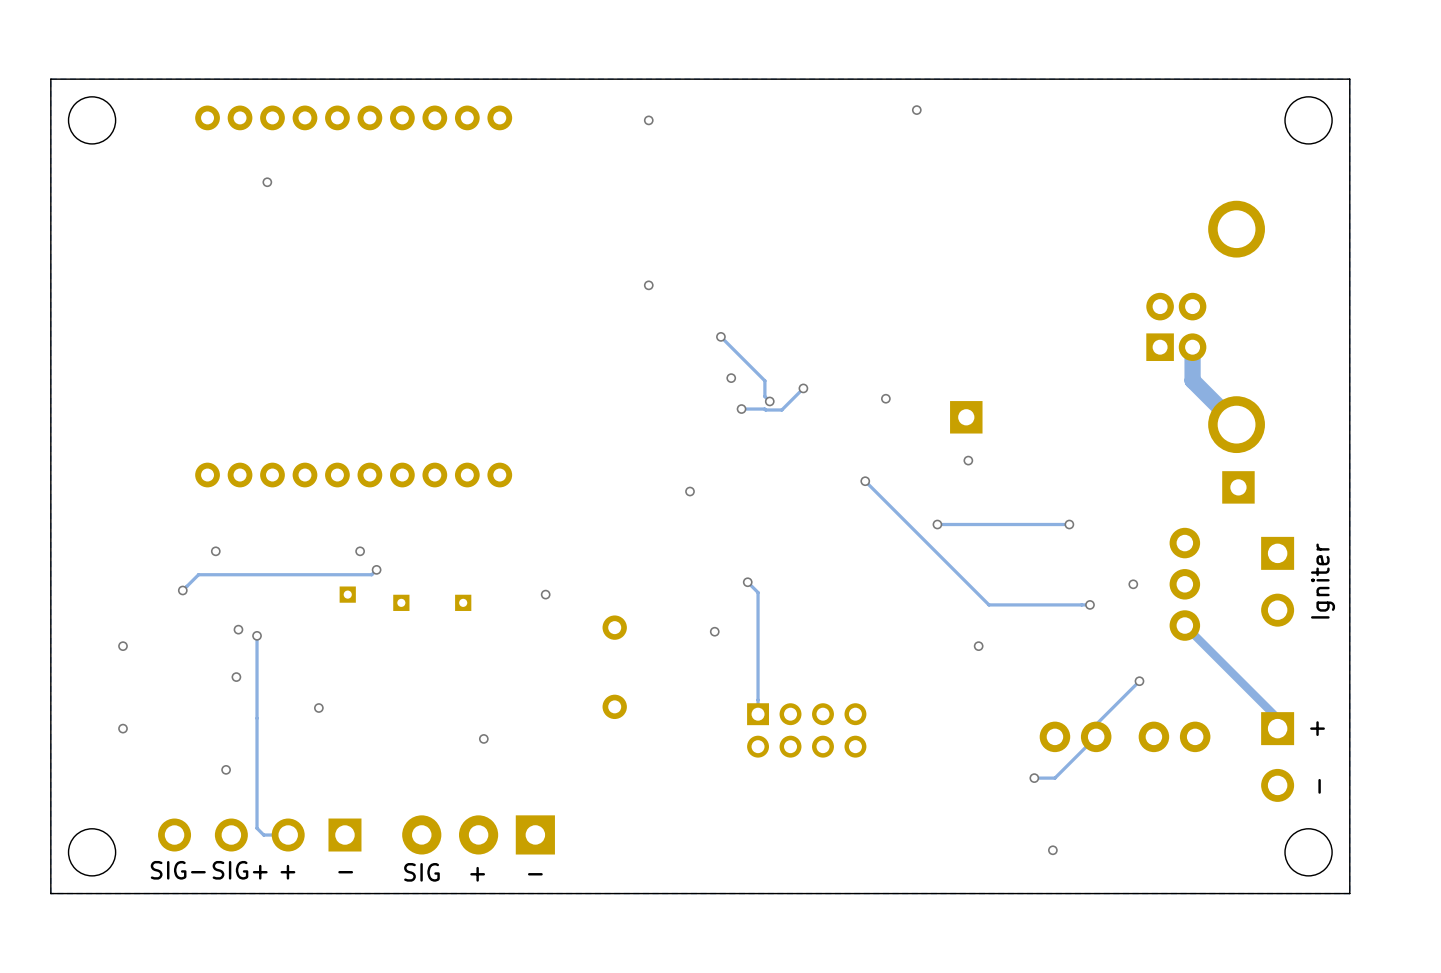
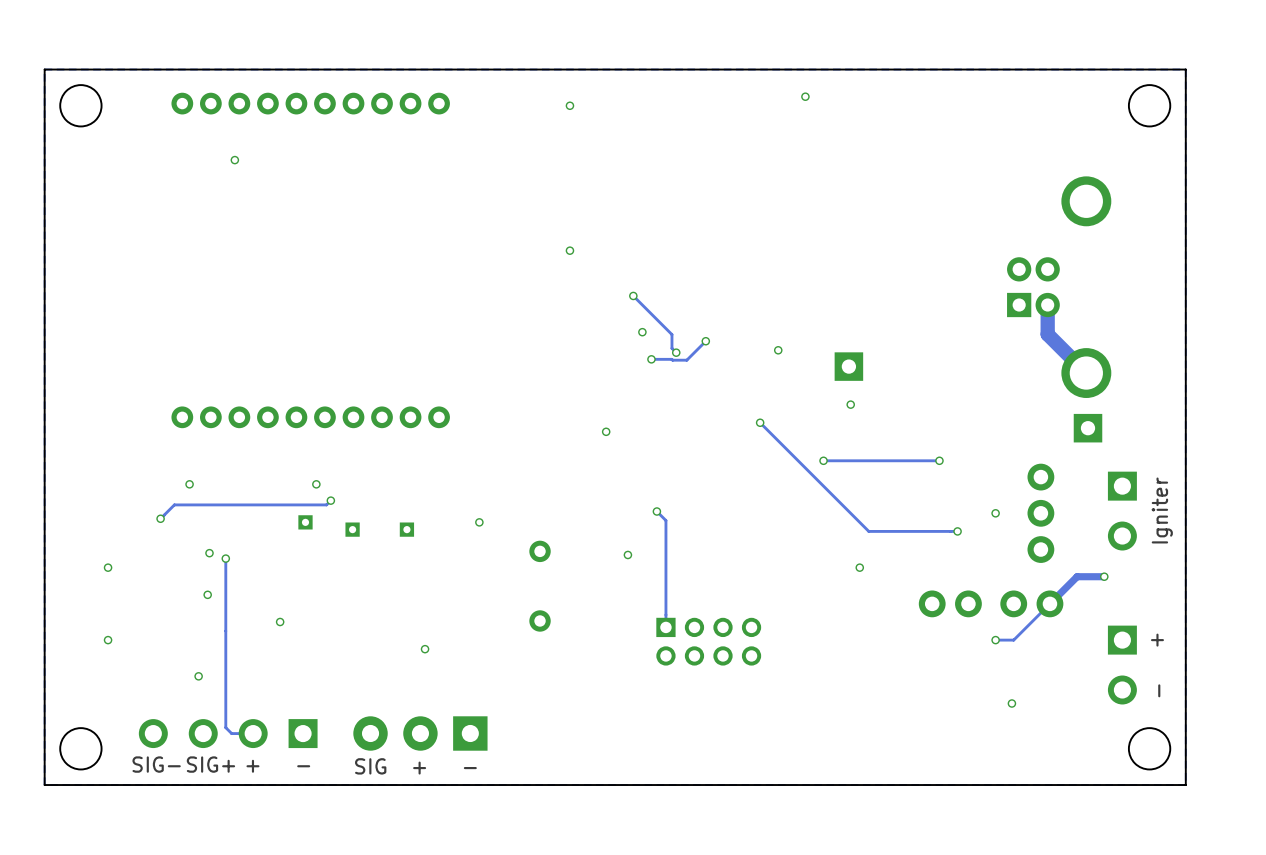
track: (1184, 625) (1277, 718) (1277, 728) -> none
track: none -> (1104, 576) (1077, 576) (1013, 640) (995, 640)
via: none -> (1104, 576)
track: (1139, 681) (1096, 724) (1096, 736) (1054, 778) (1034, 778) -> none
via position: (1139, 681) -> (995, 640)
part position: (1075, 736) -> (950, 603)
part position: (1174, 736) -> (1031, 603)
via: (1034, 778) -> none
via: none -> (1011, 703)
via: (1052, 850) -> none

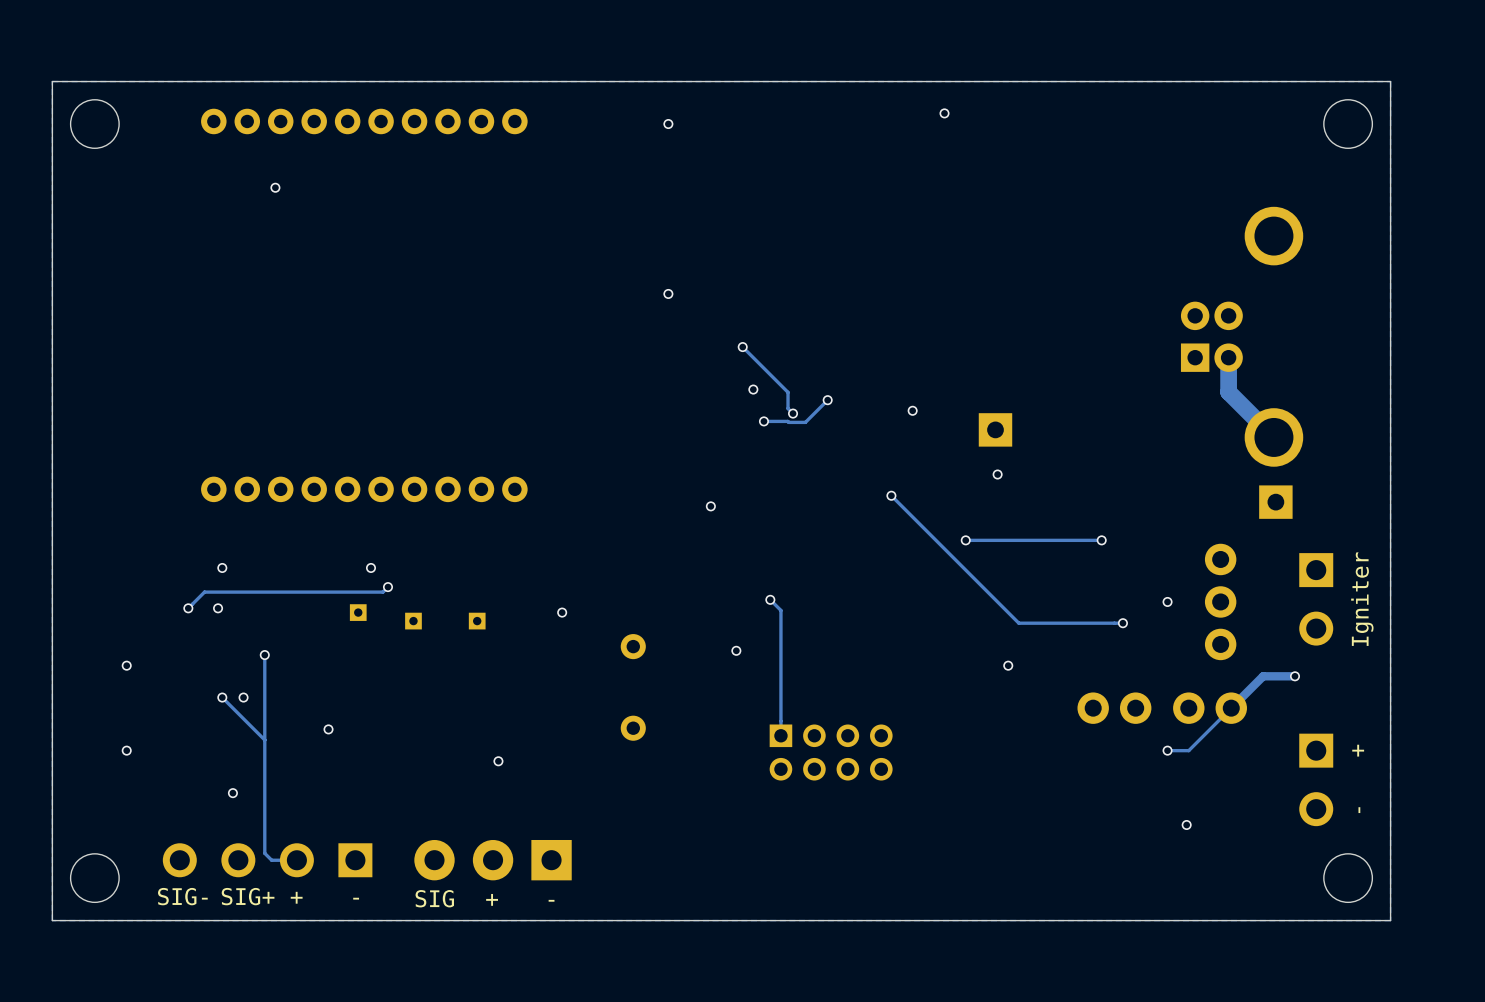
via: none -> (218, 608)
via: (209, 553) -> none
track: none -> (222, 697) (264, 740)
via: none -> (222, 697)

